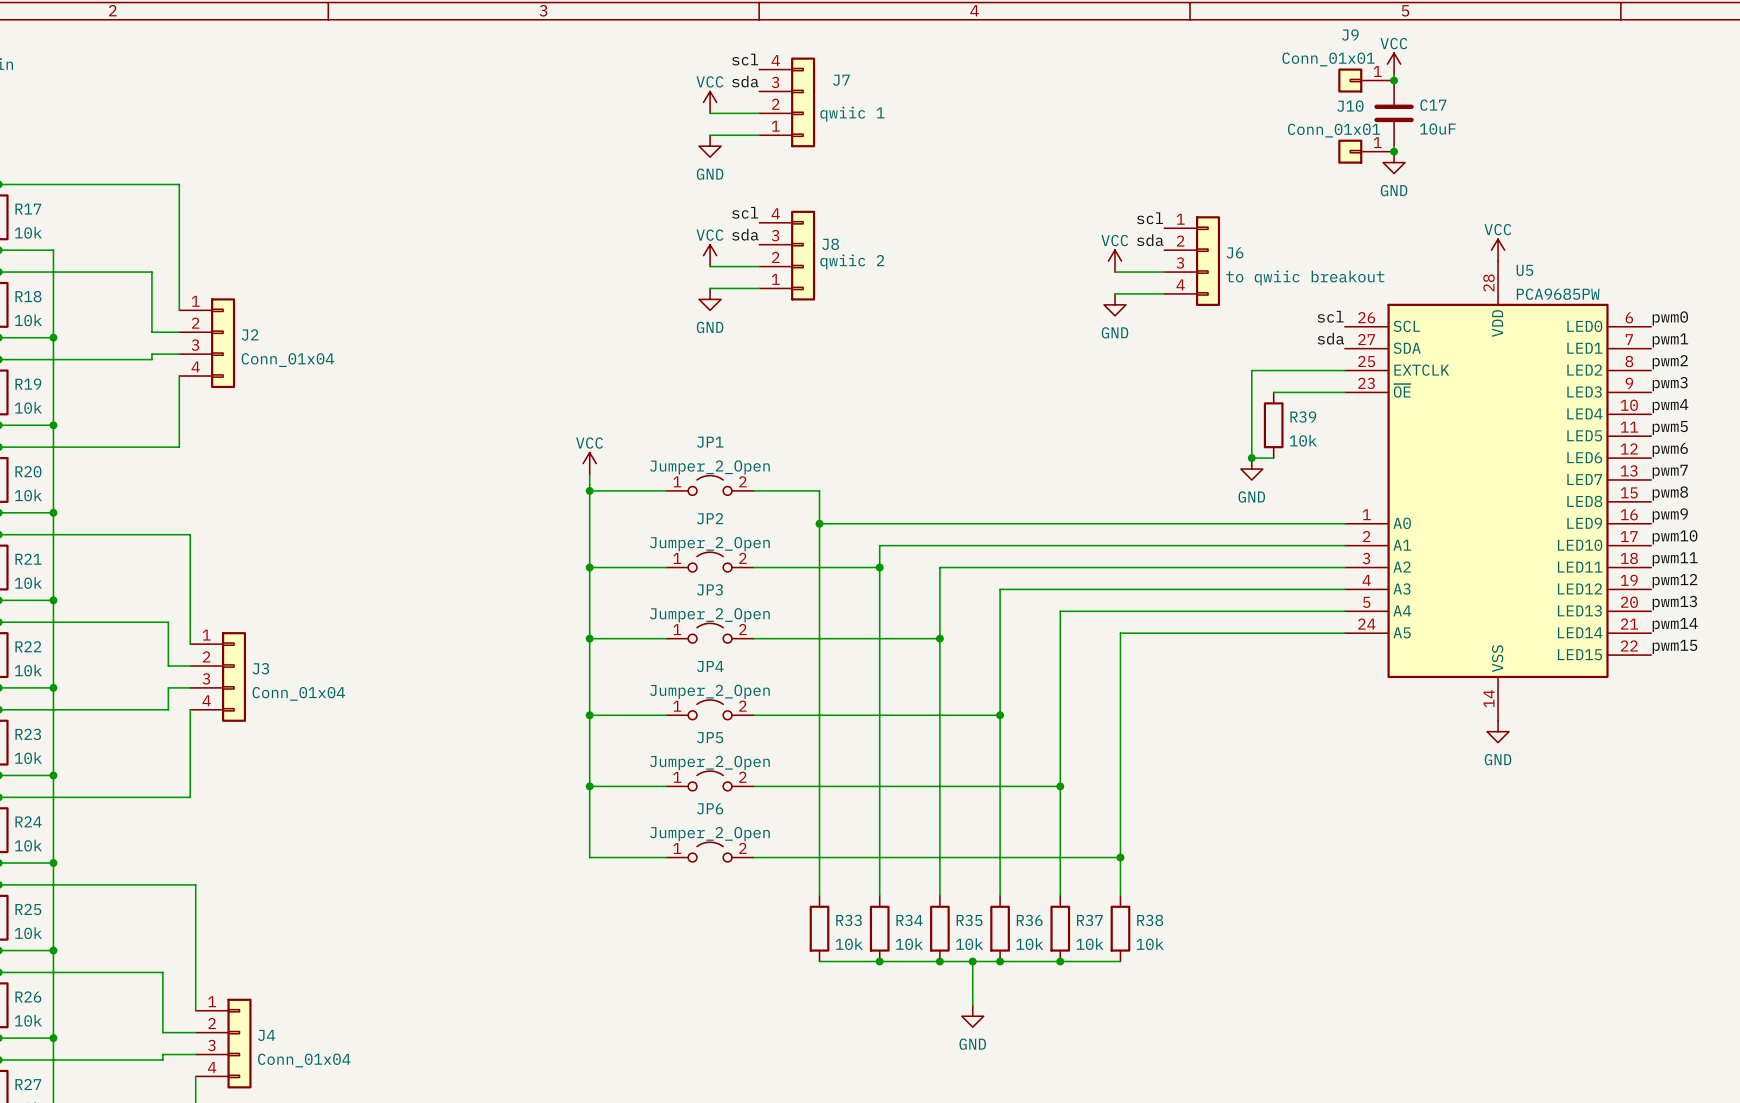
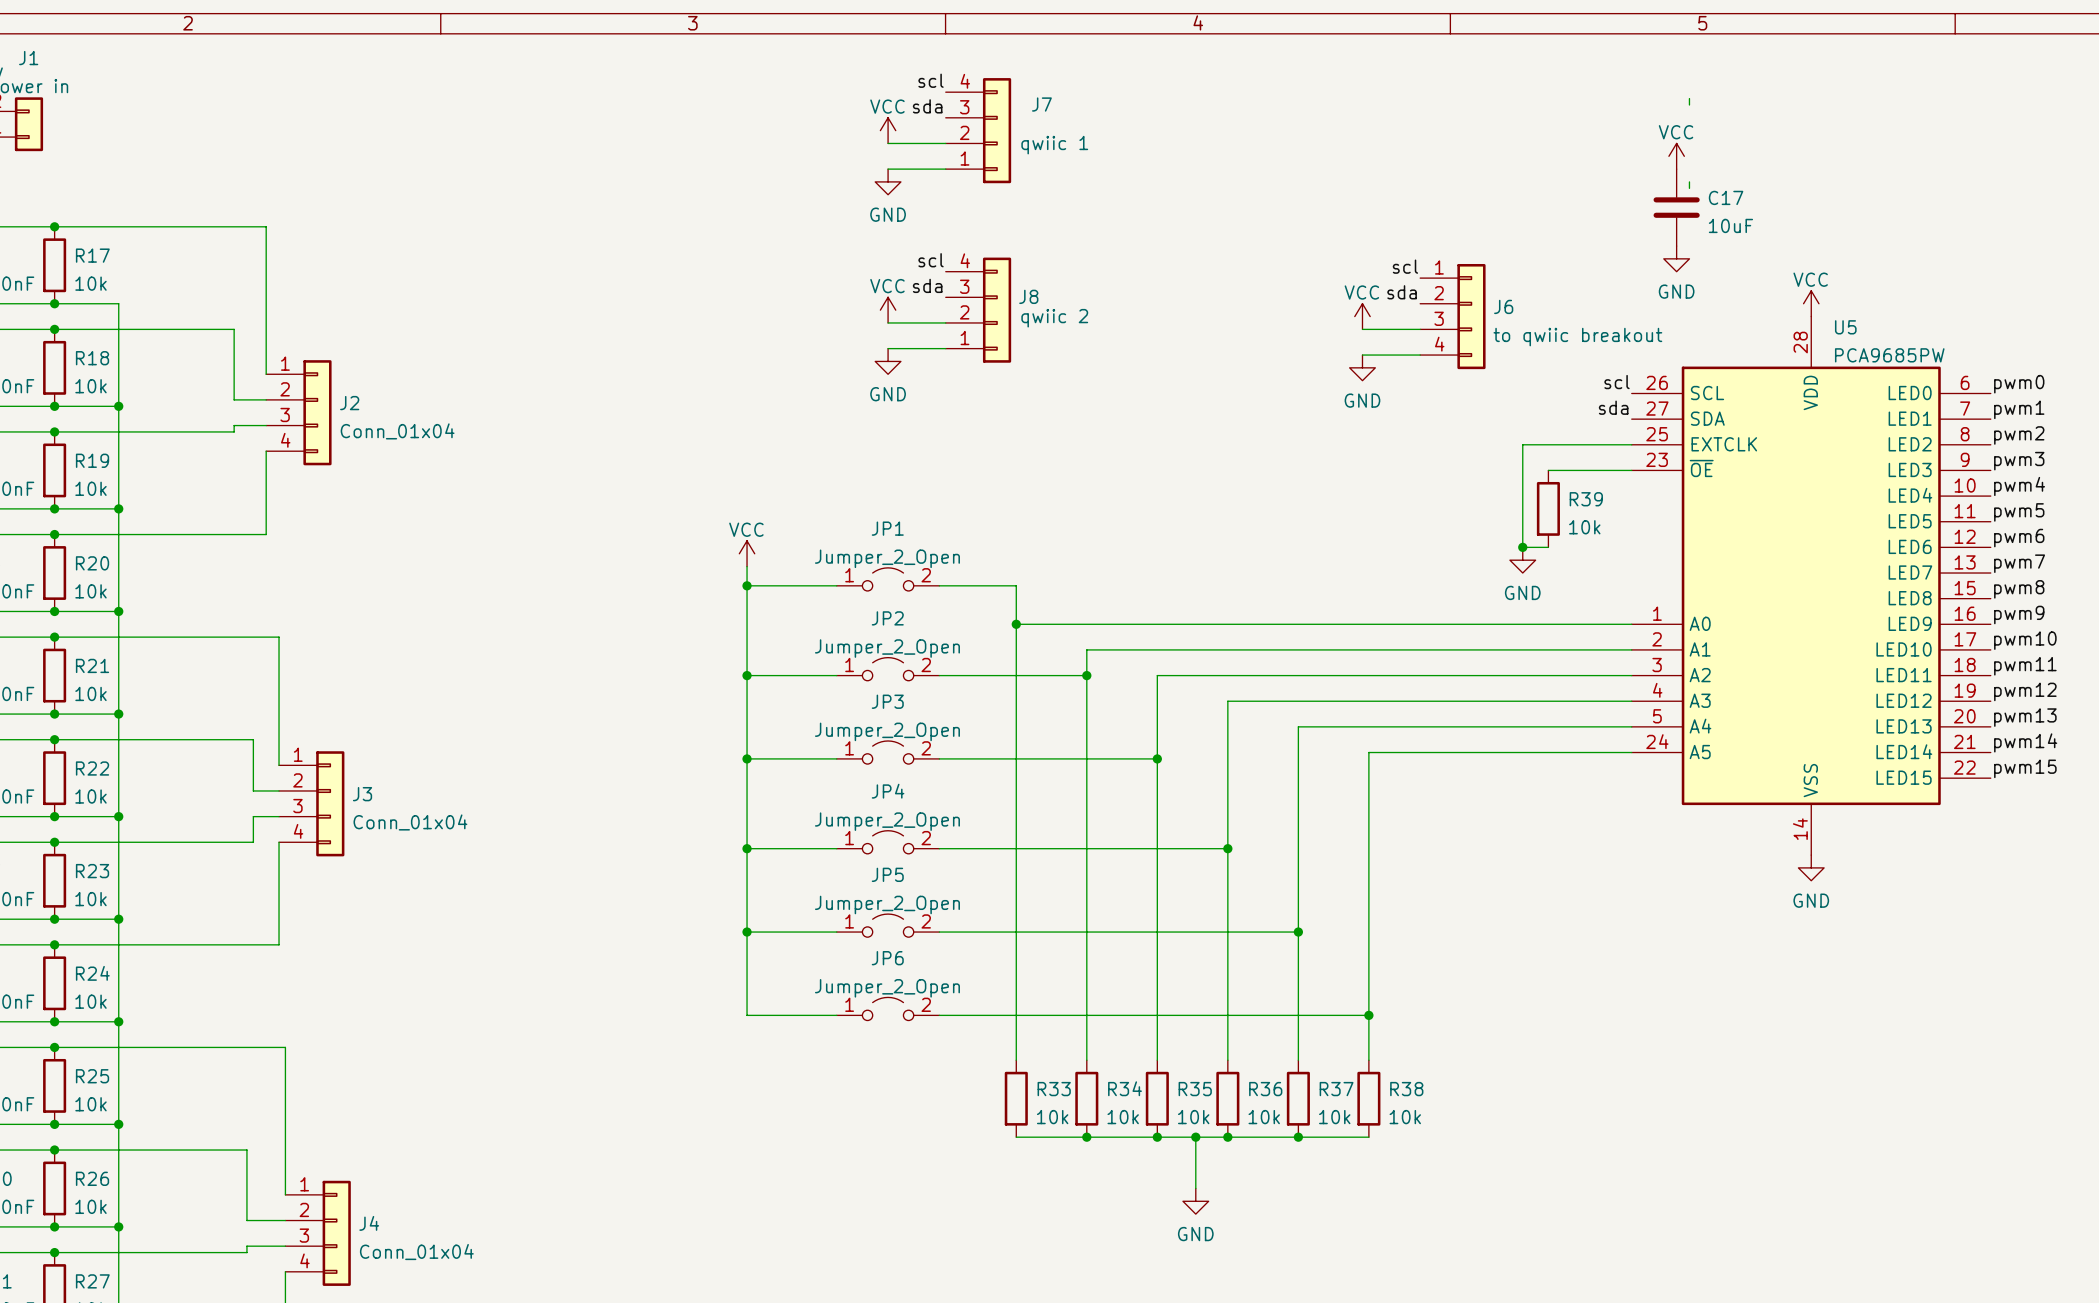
power symbol position: VCC (1394, 64) -> VCC (1676, 156)
J9: Conn_01x01 (1366, 80) -> none
junction: (1394, 80) -> none
C17 position: (1394, 113) -> (1676, 207)
J10: Conn_01x01 (1366, 151) -> none
junction: (1394, 151) -> none
power symbol position: GND (1394, 162) -> GND (1676, 258)

